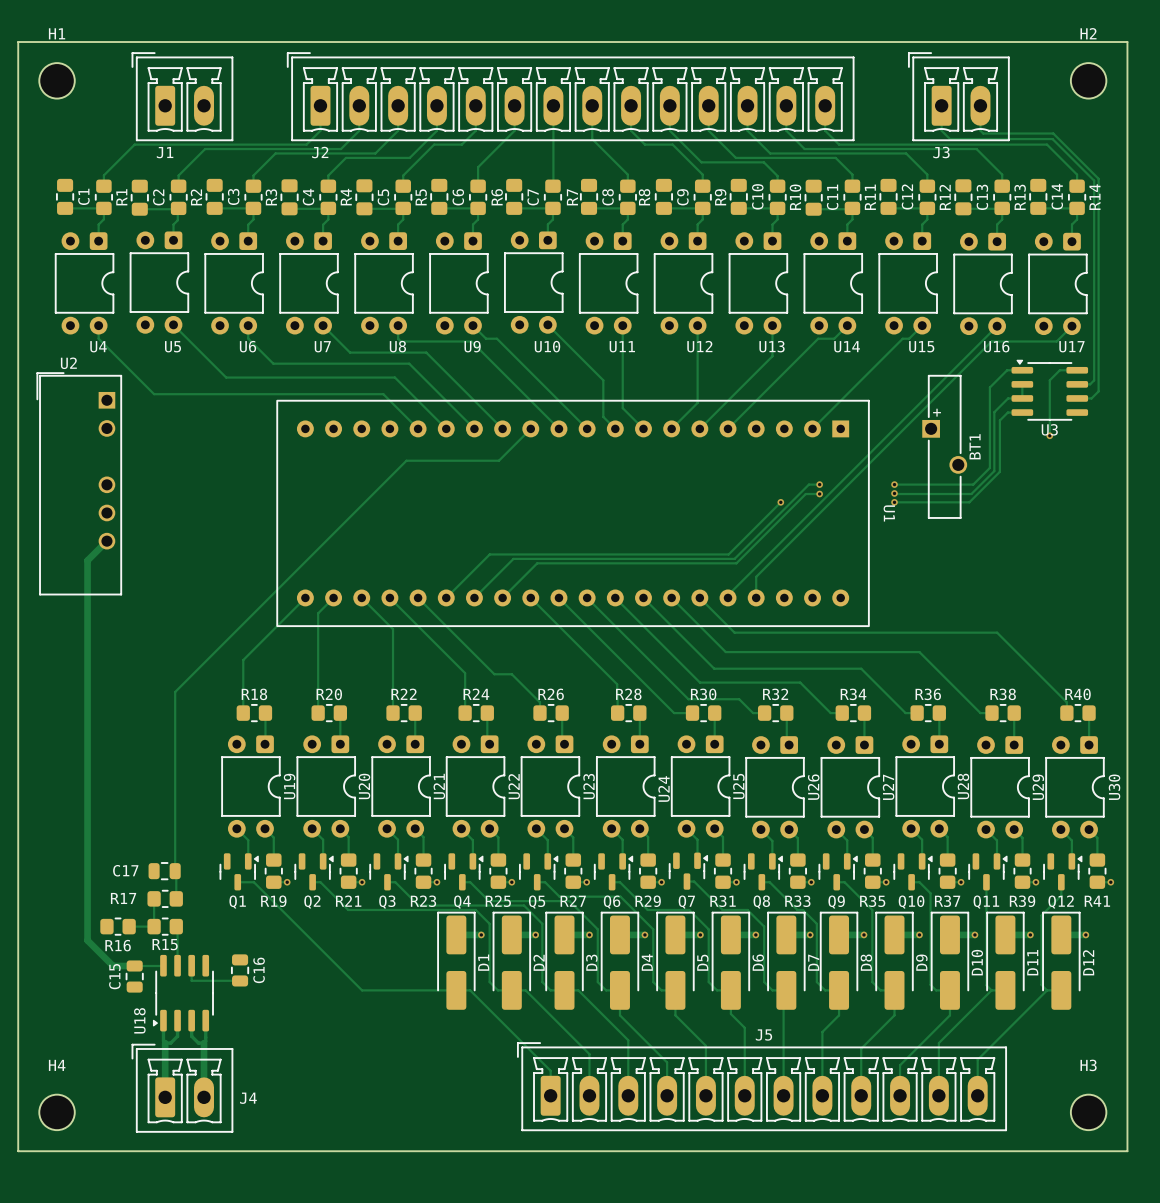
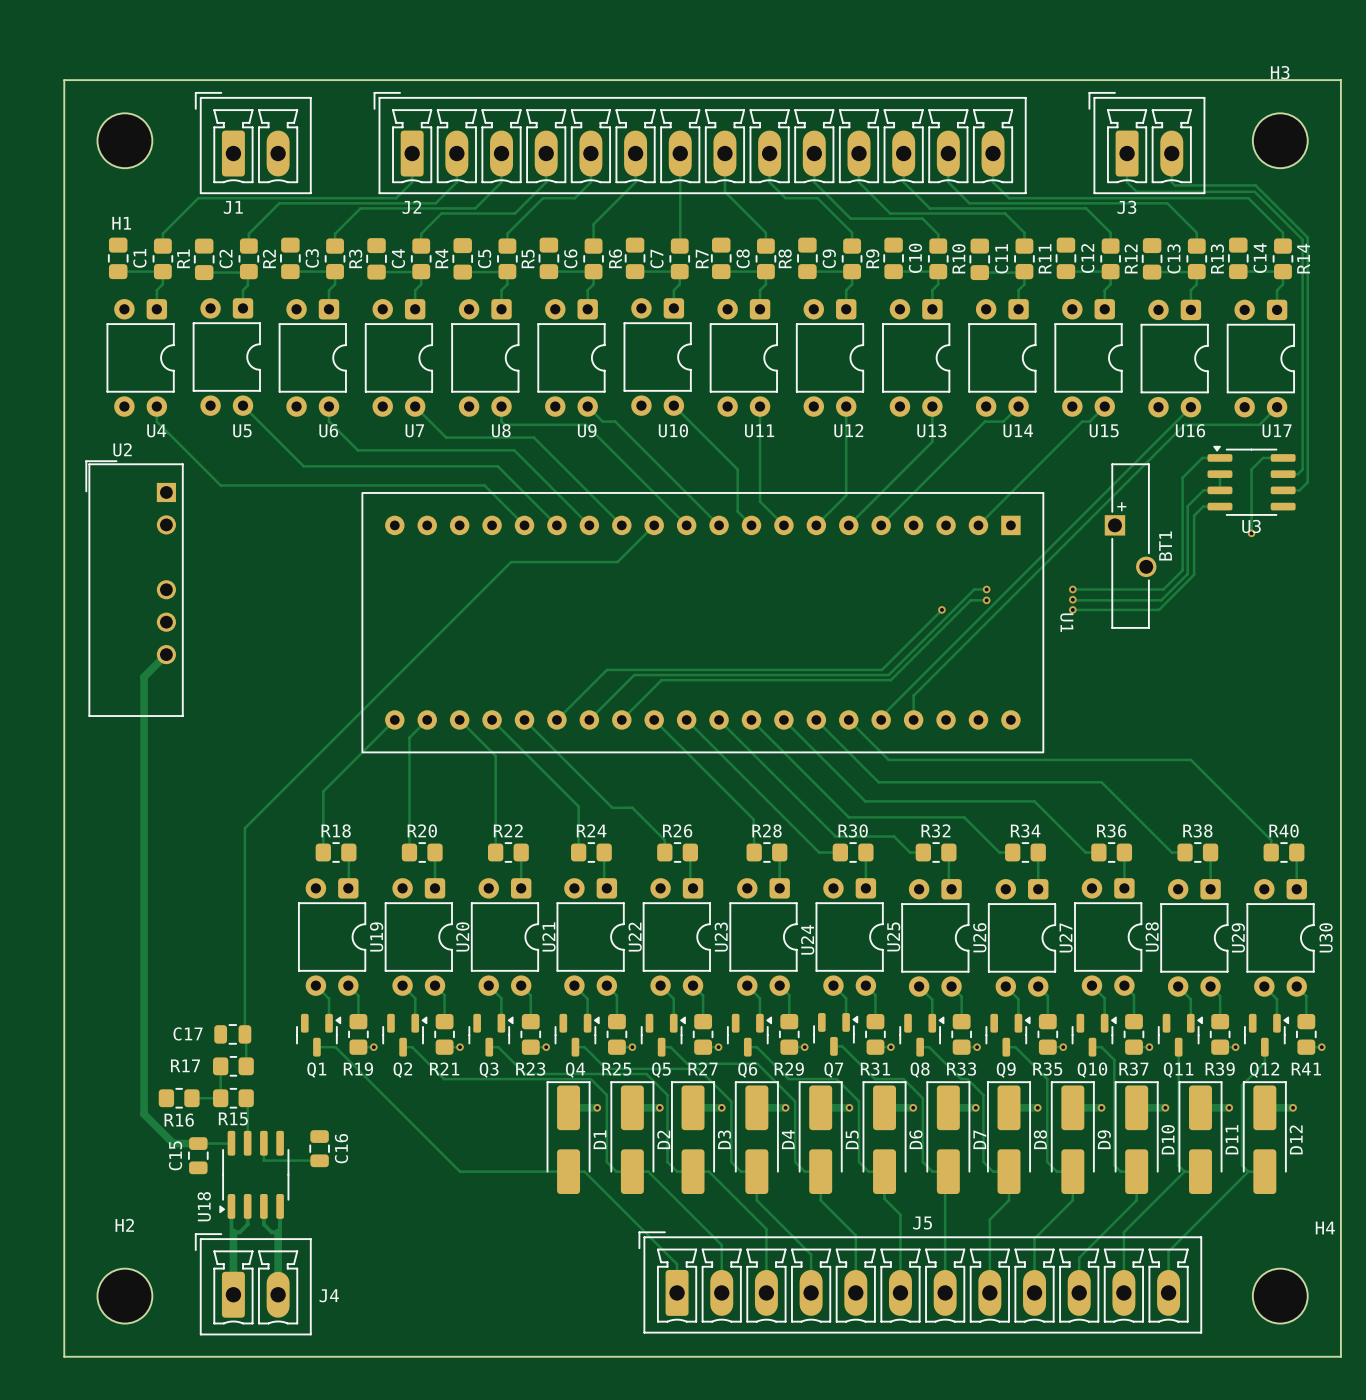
H1 name position: H1 (57, 33) -> H1 (121, 223)
H1 footprint: [39, 63, 75, 99] -> [97, 113, 153, 169]
H2 footprint: [1070, 63, 1107, 99] -> [97, 1268, 153, 1324]
H4 name position: H4 (57, 1065) -> H4 (1325, 1227)
H4 footprint: [39, 1094, 75, 1131] -> [1252, 1268, 1308, 1324]
H3 footprint: [1070, 1094, 1107, 1131] -> [1252, 113, 1308, 169]

